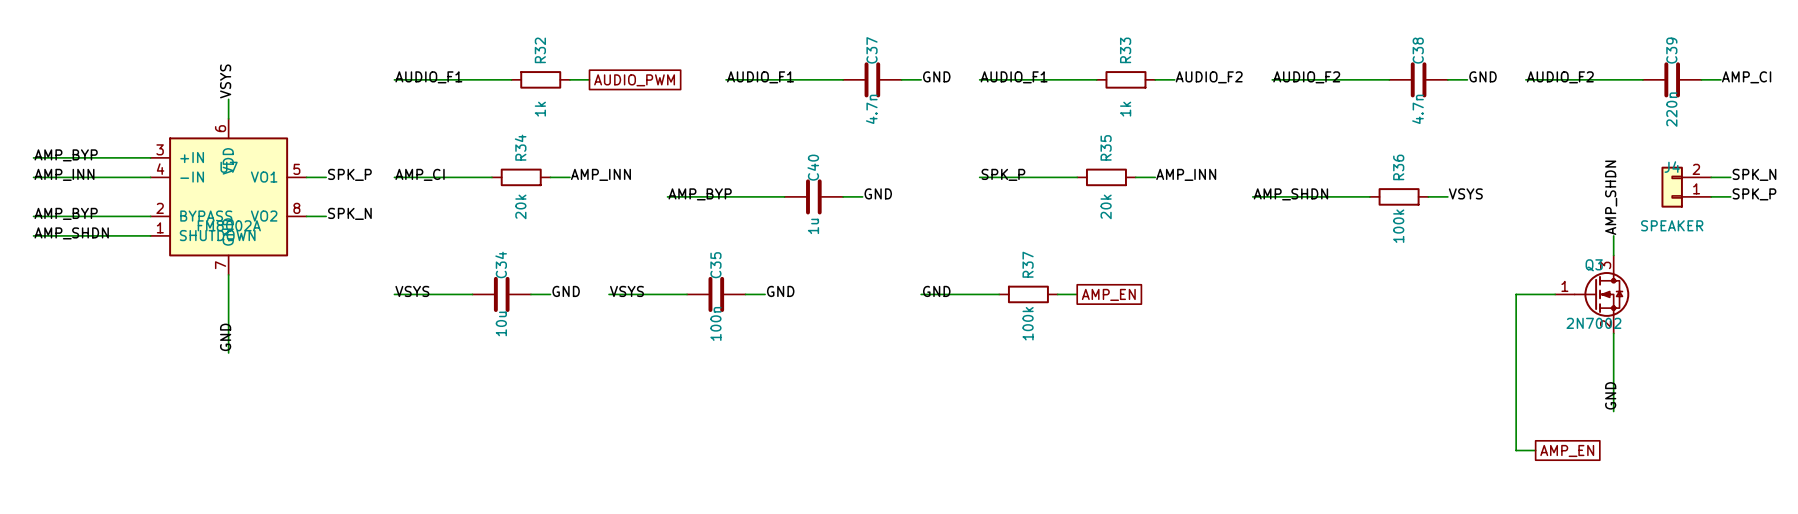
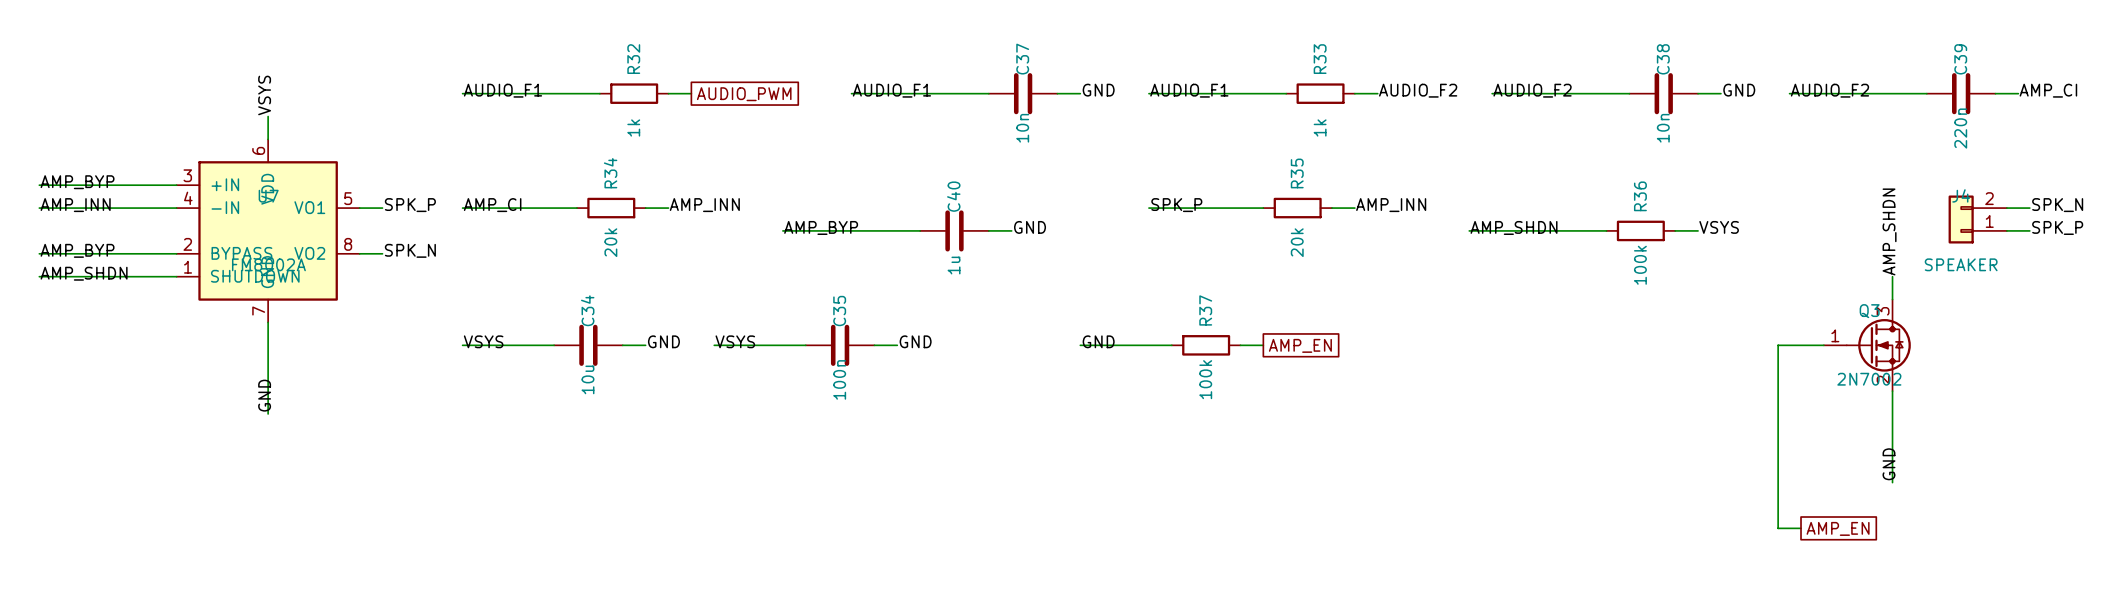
C37 value: 4.7n (871, 109) -> 10n (1022, 128)
C38 value: 4.7n (1417, 109) -> 10n (1663, 128)

